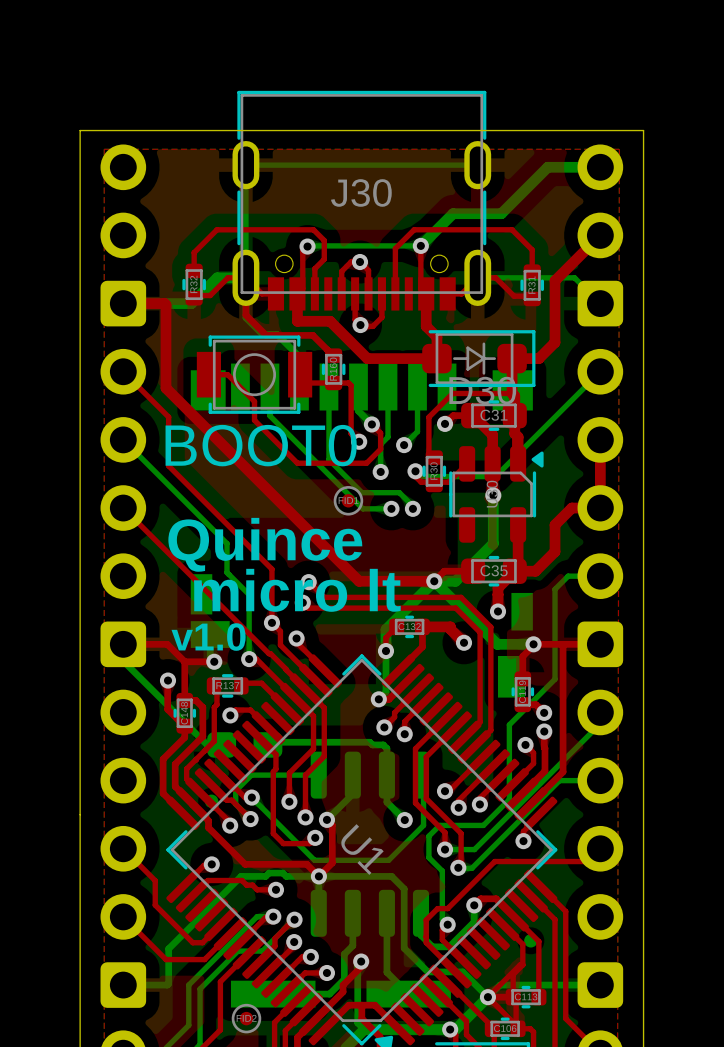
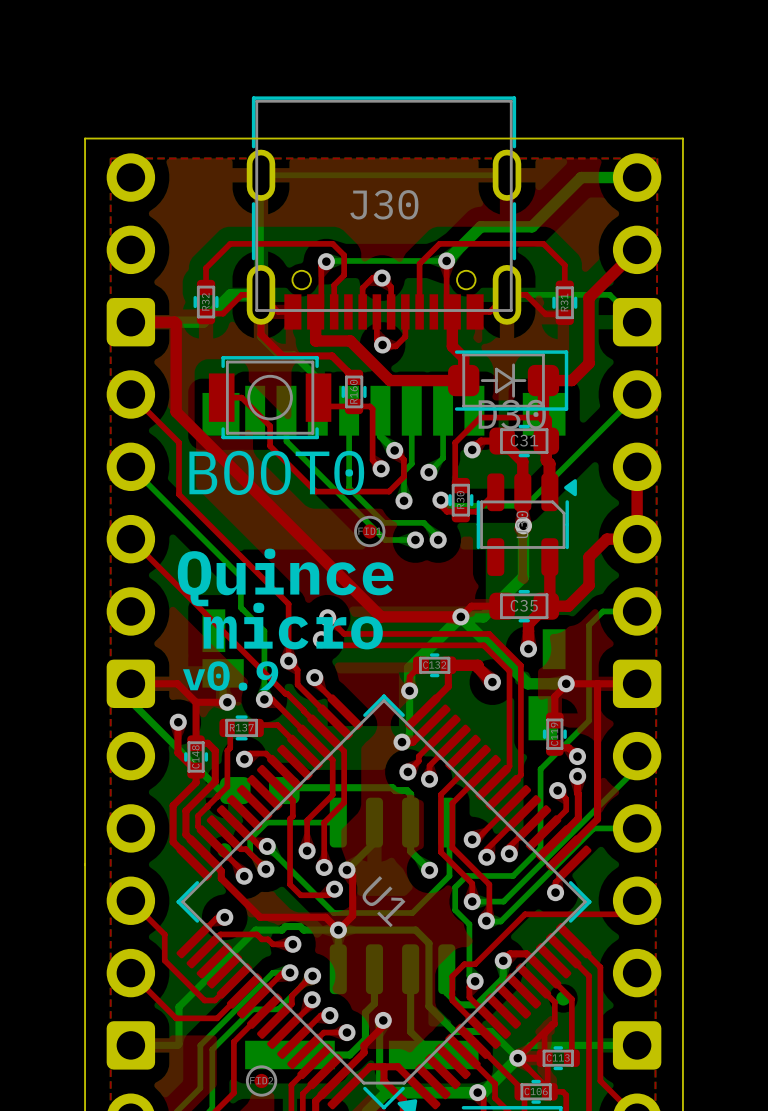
text: micro lt (297, 590) -> micro (293, 626)
text: v1.0 (208, 637) -> v0.9 (230, 676)

